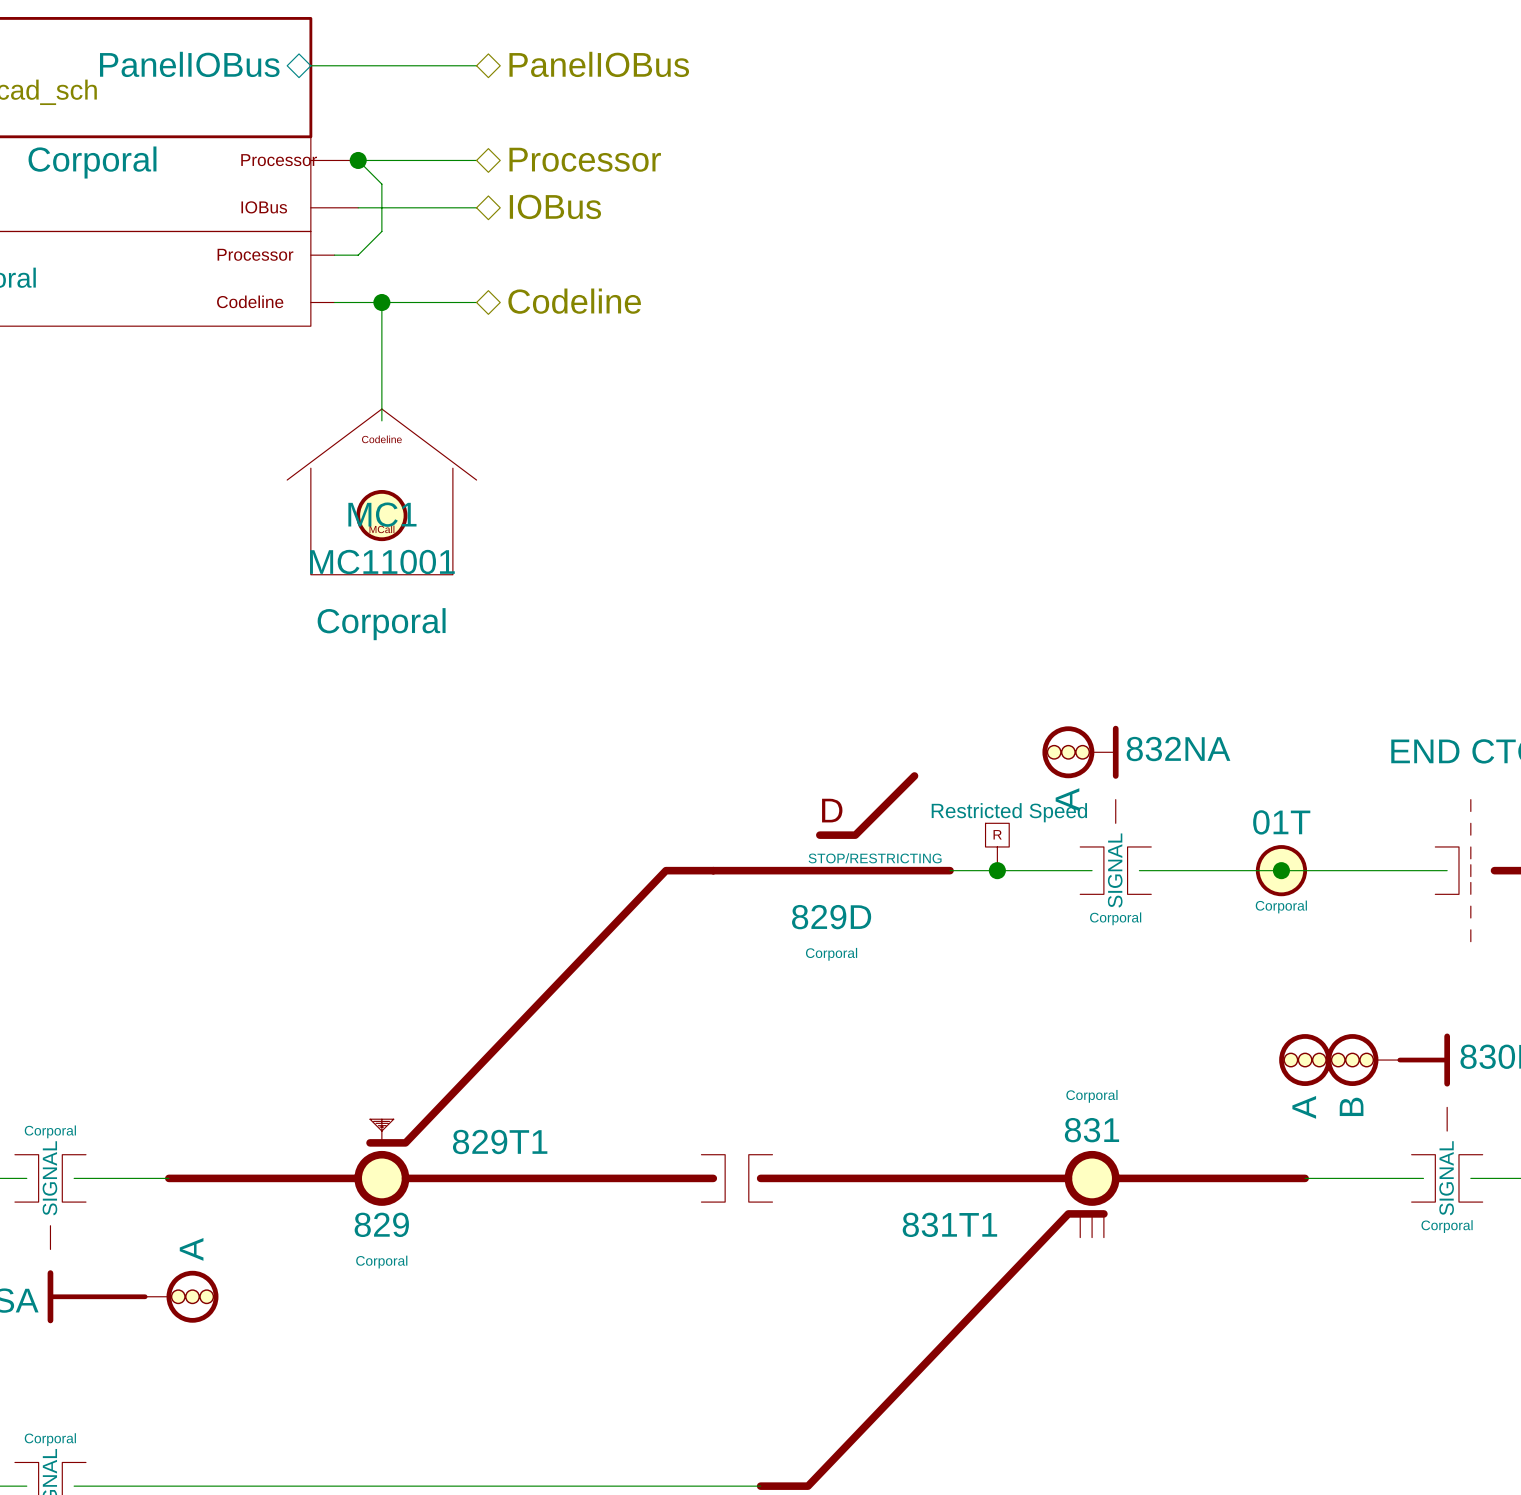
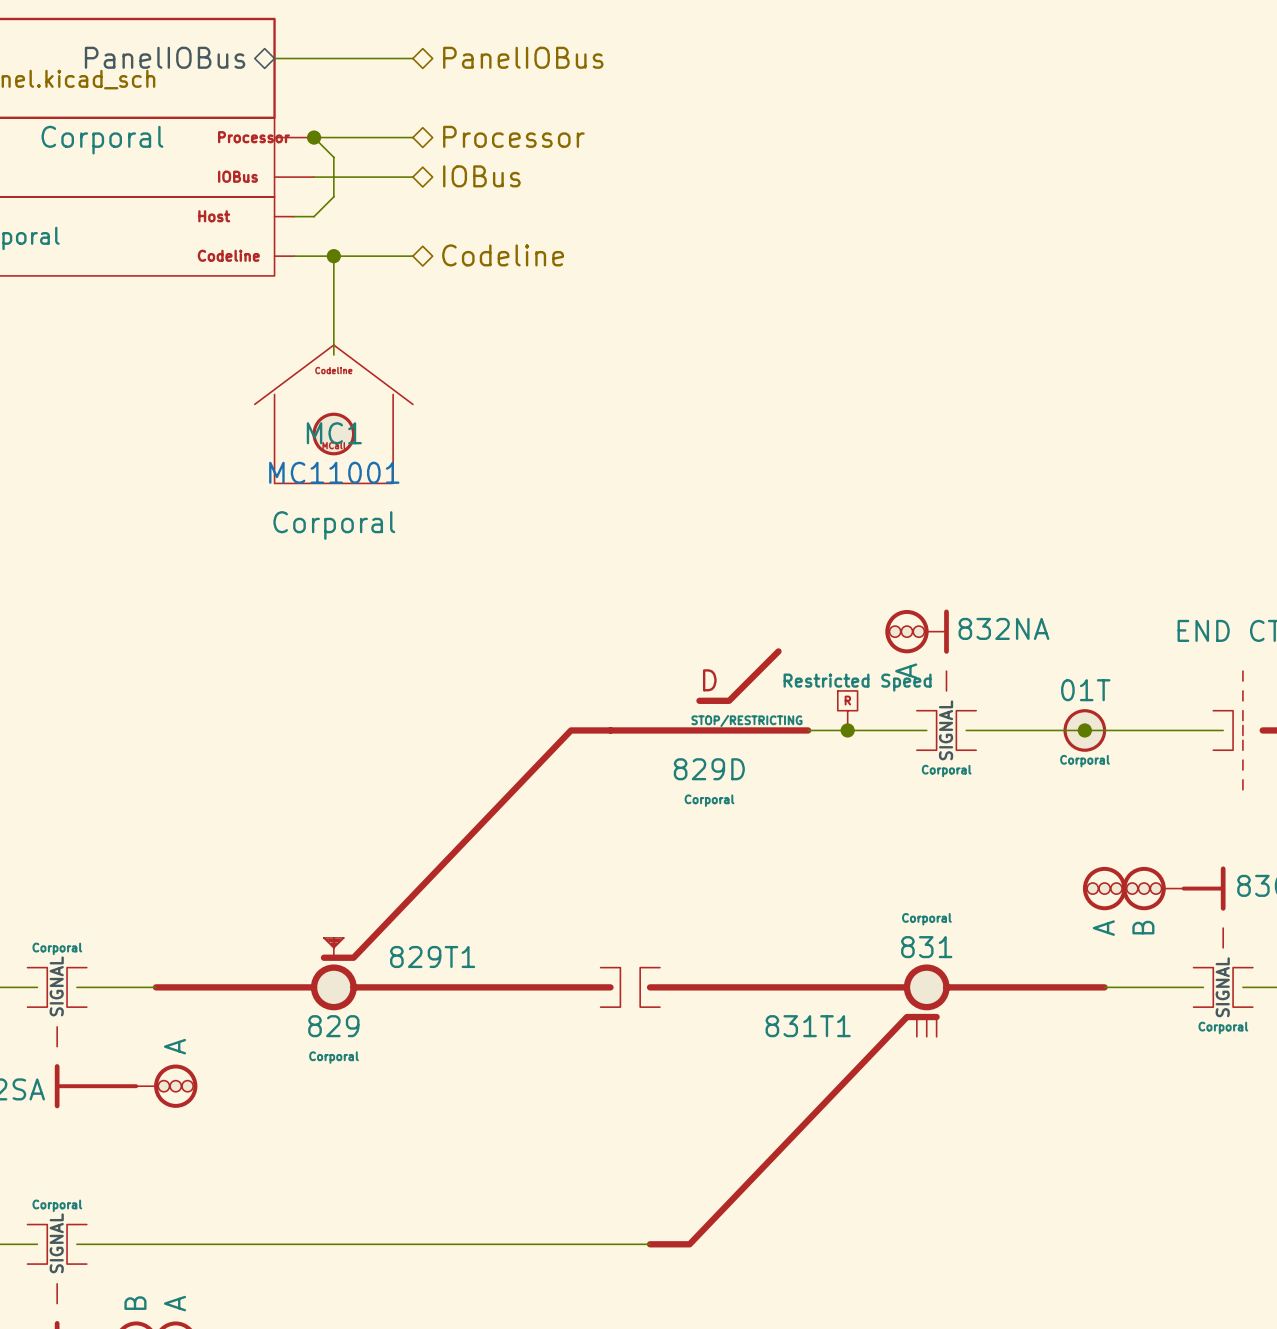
part text: Processor (255, 254) -> Host (214, 216)

